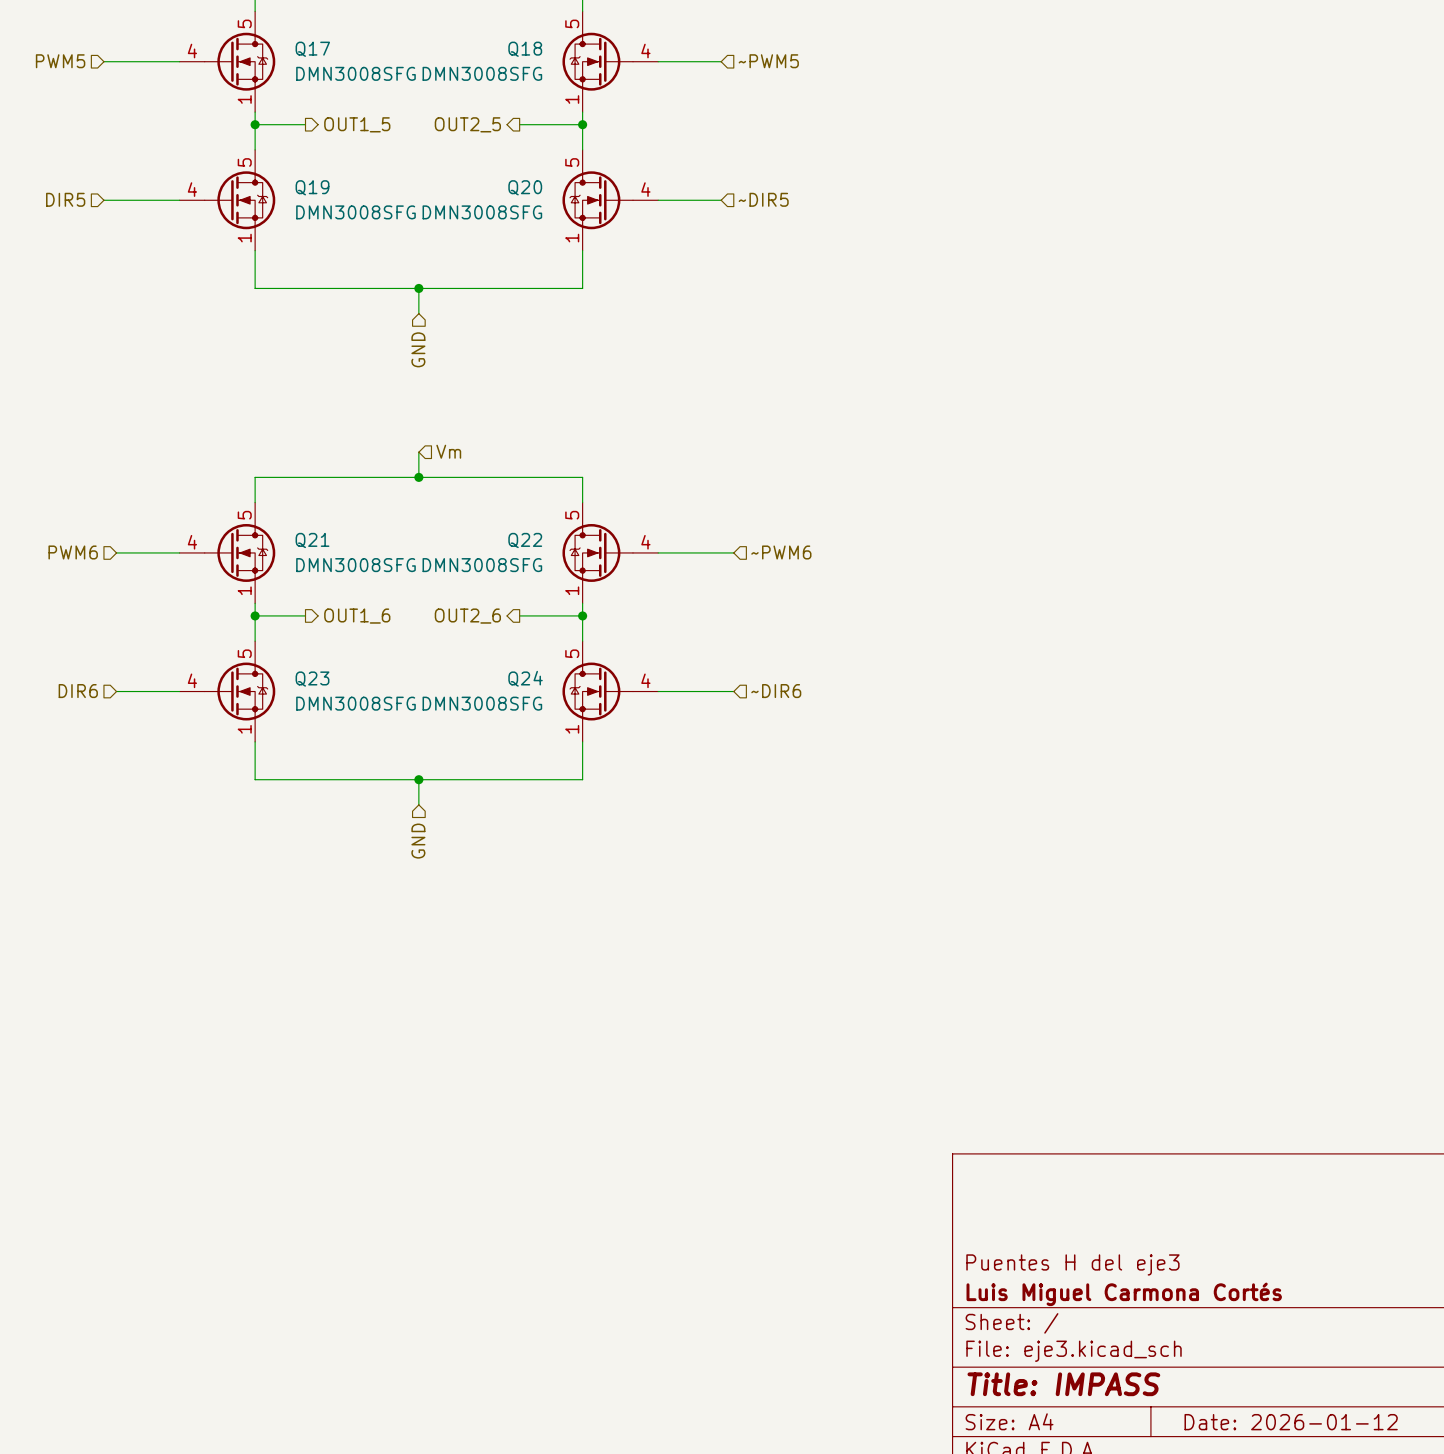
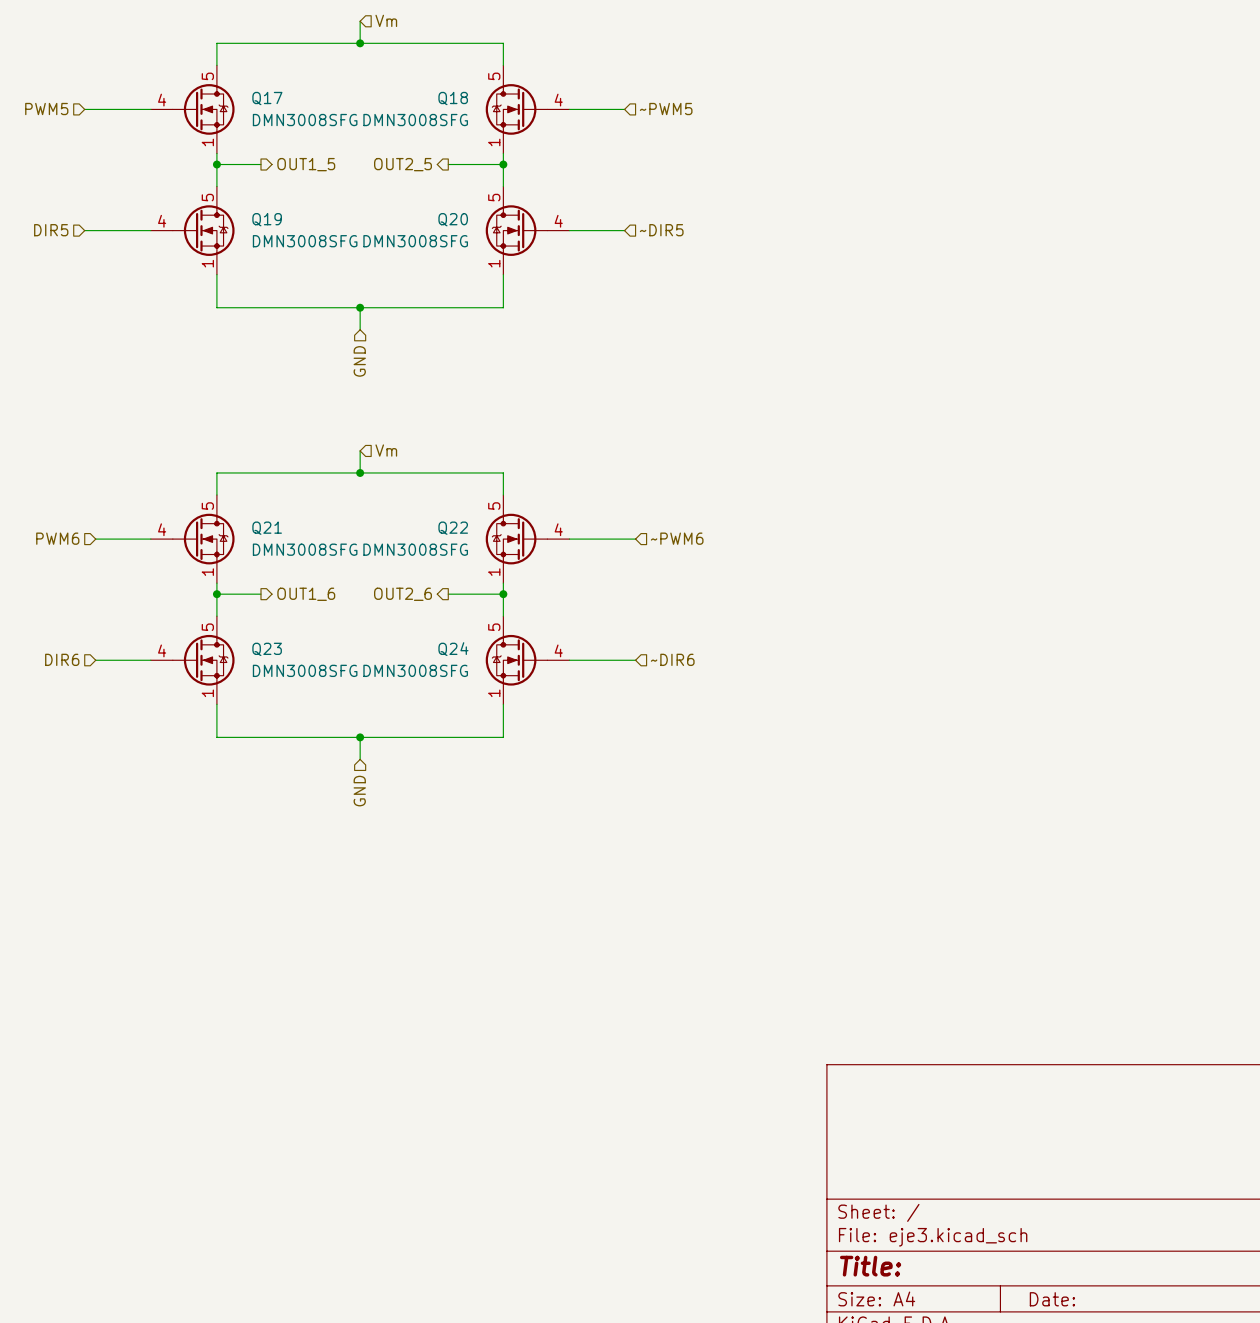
title block: Puentes H del eje3 (1072, 1264) -> none
title block: Luis Miguel Carmona Cortés (1124, 1294) -> none
title block: Title: IMPASS (1063, 1384) -> Title: (870, 1266)
title block: Date: 2026-01-12 (1291, 1422) -> Date: (1052, 1299)

